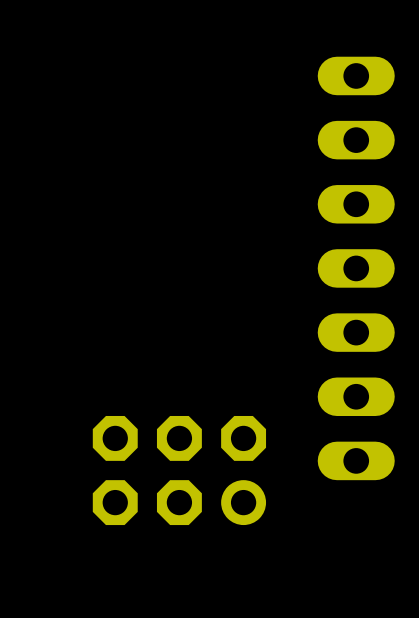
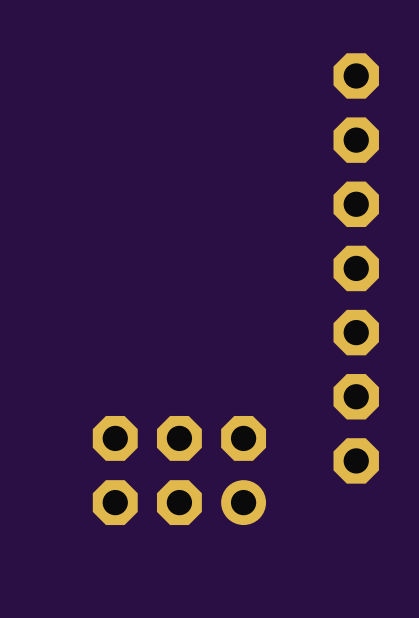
part footprint: [317, 56, 395, 481] -> [333, 53, 379, 484]

